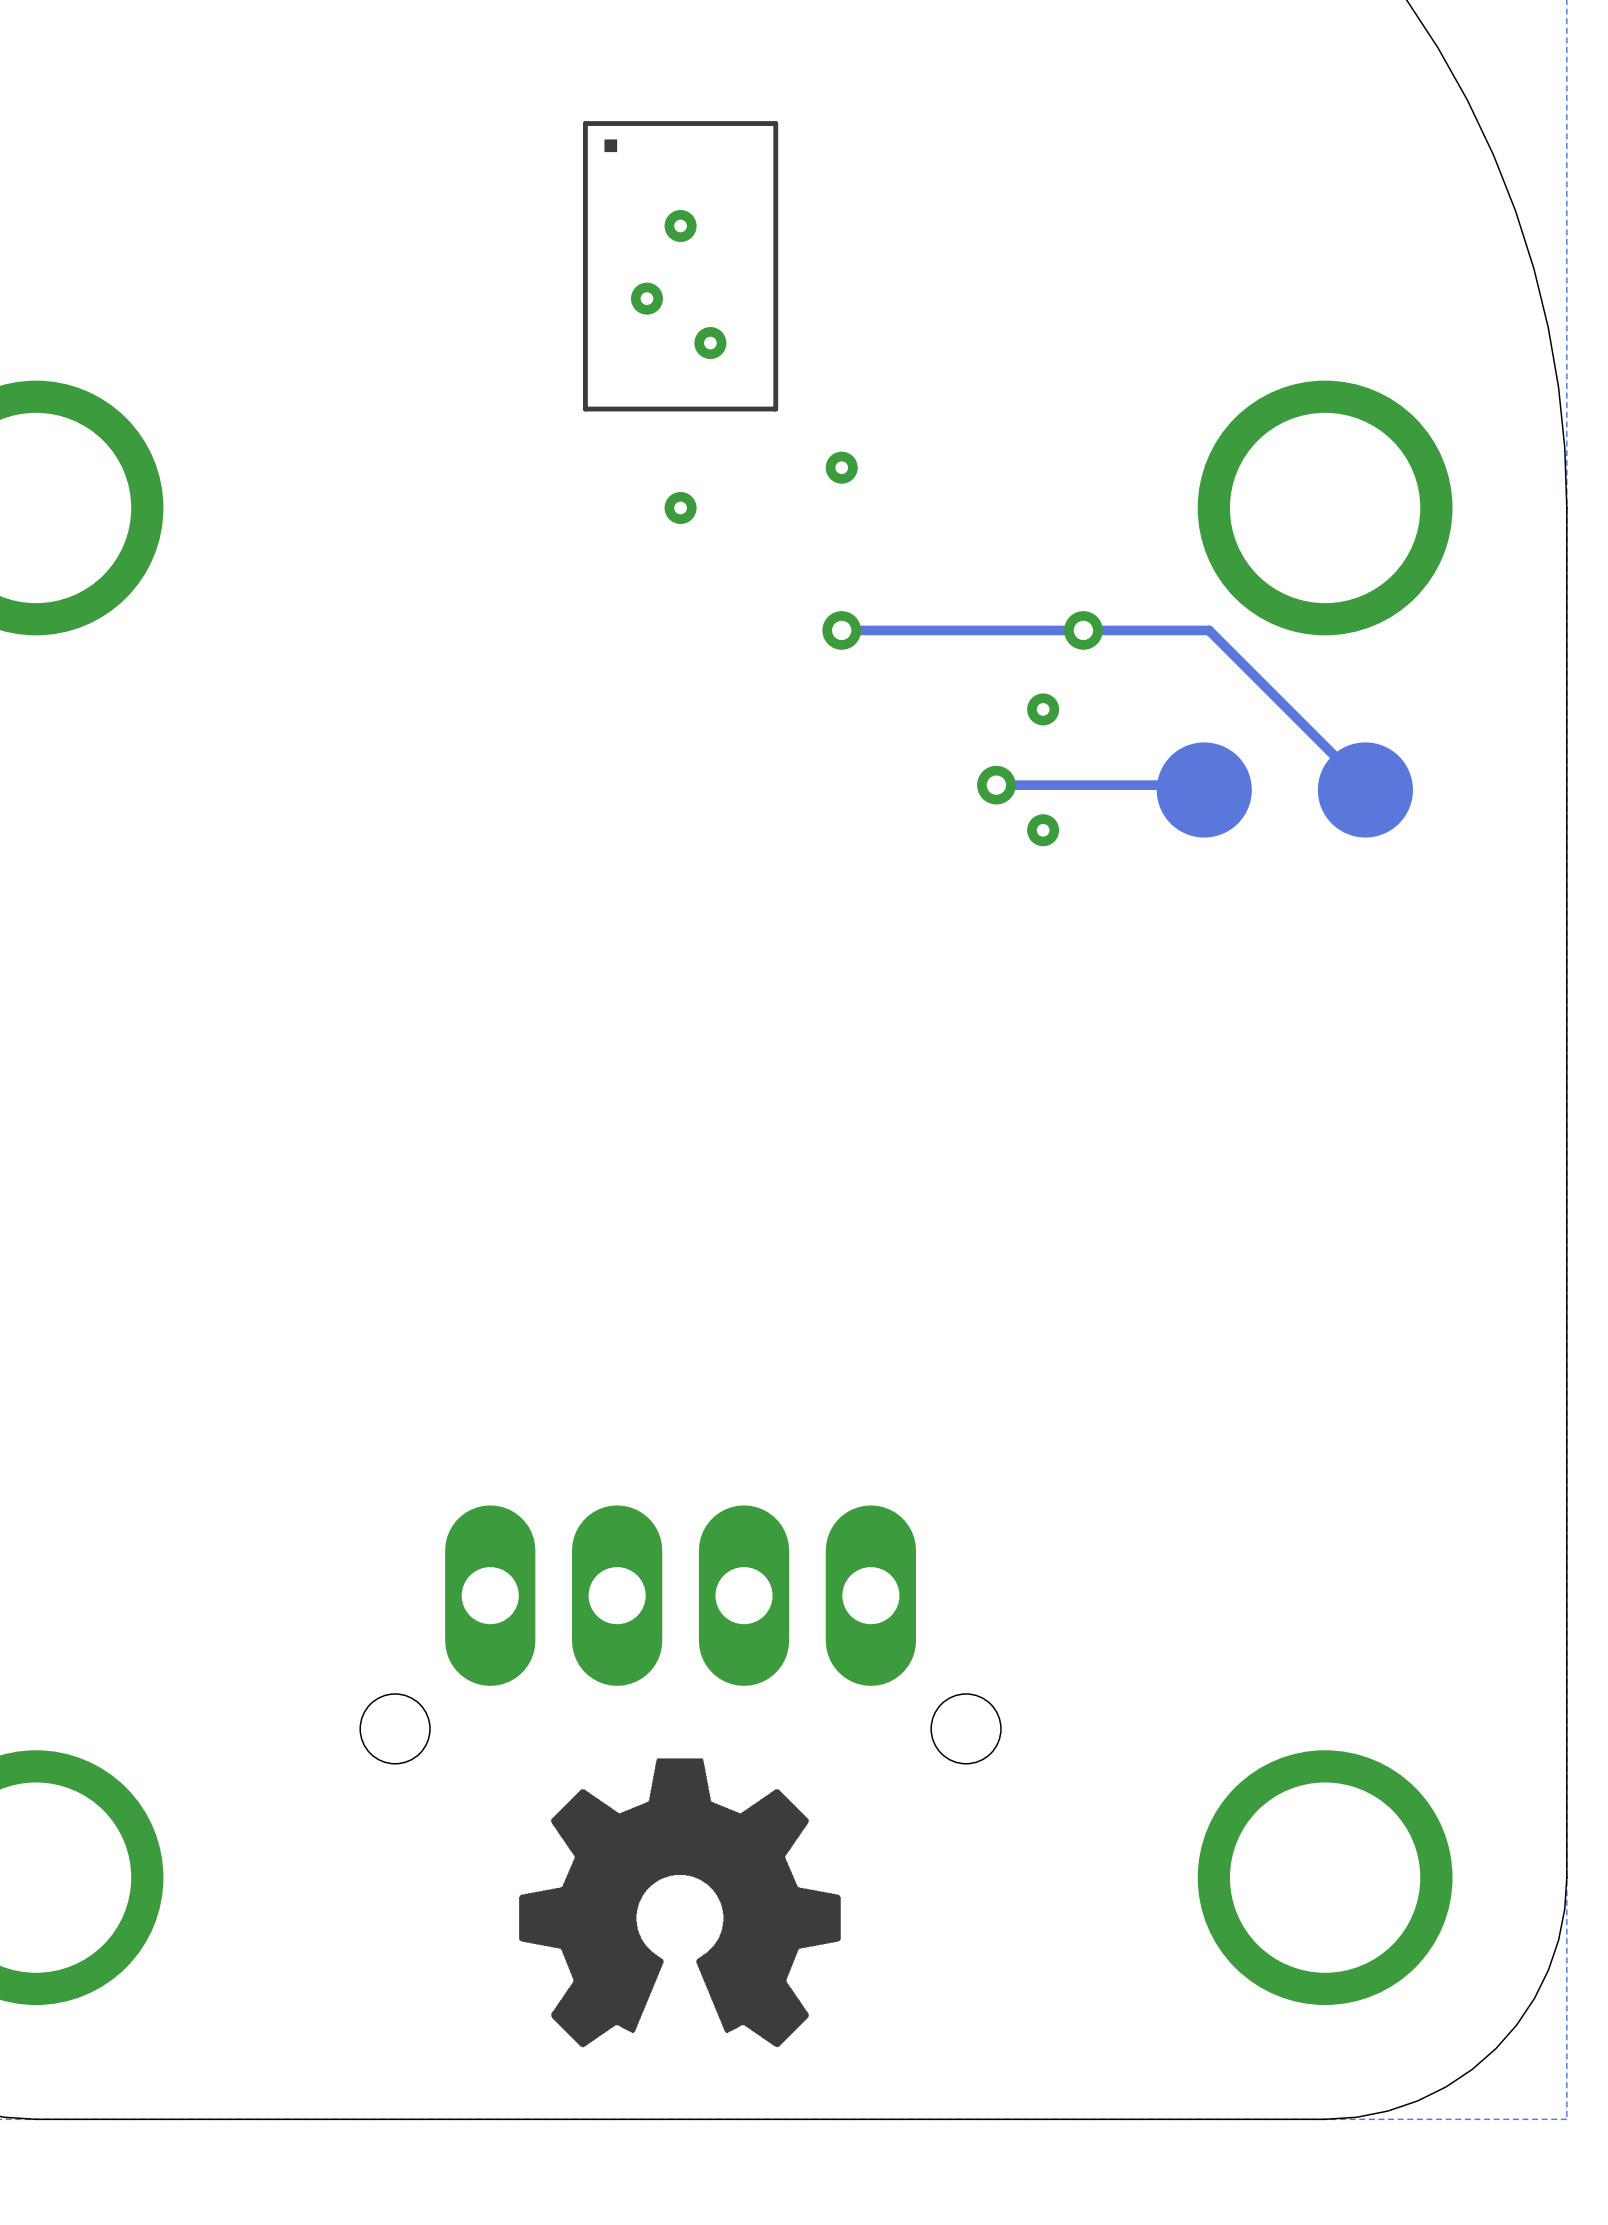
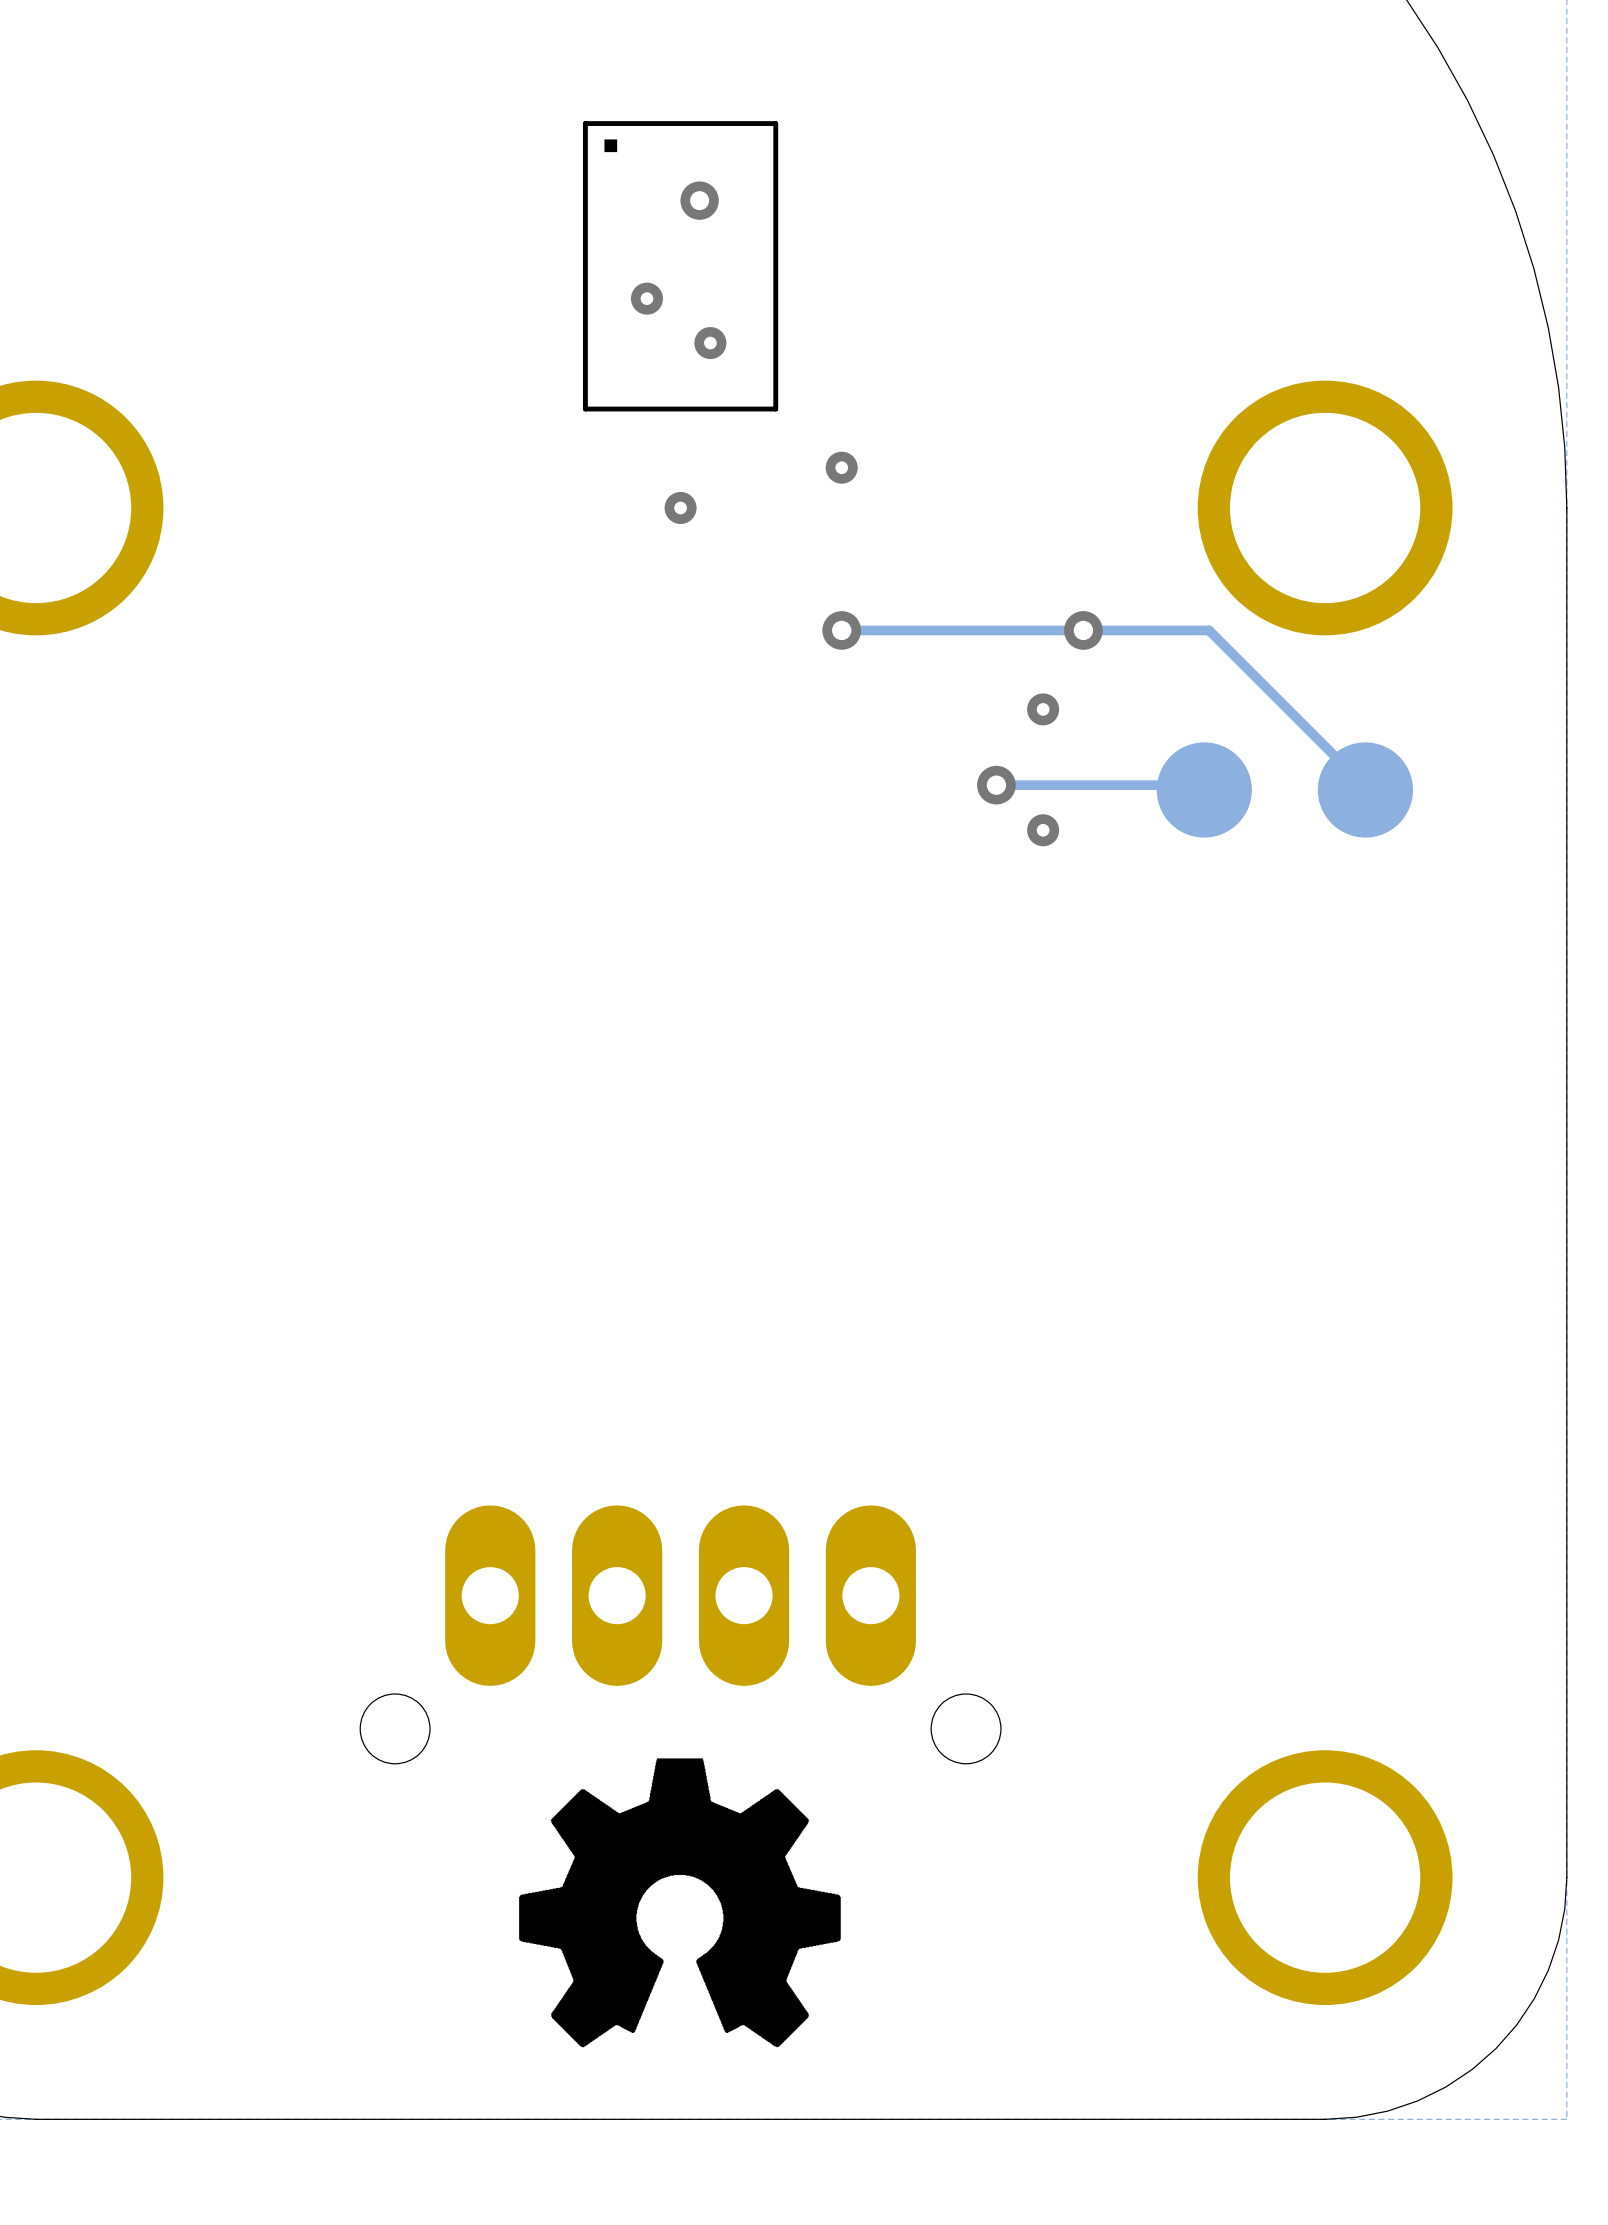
via position: (680, 226) -> (699, 200)

